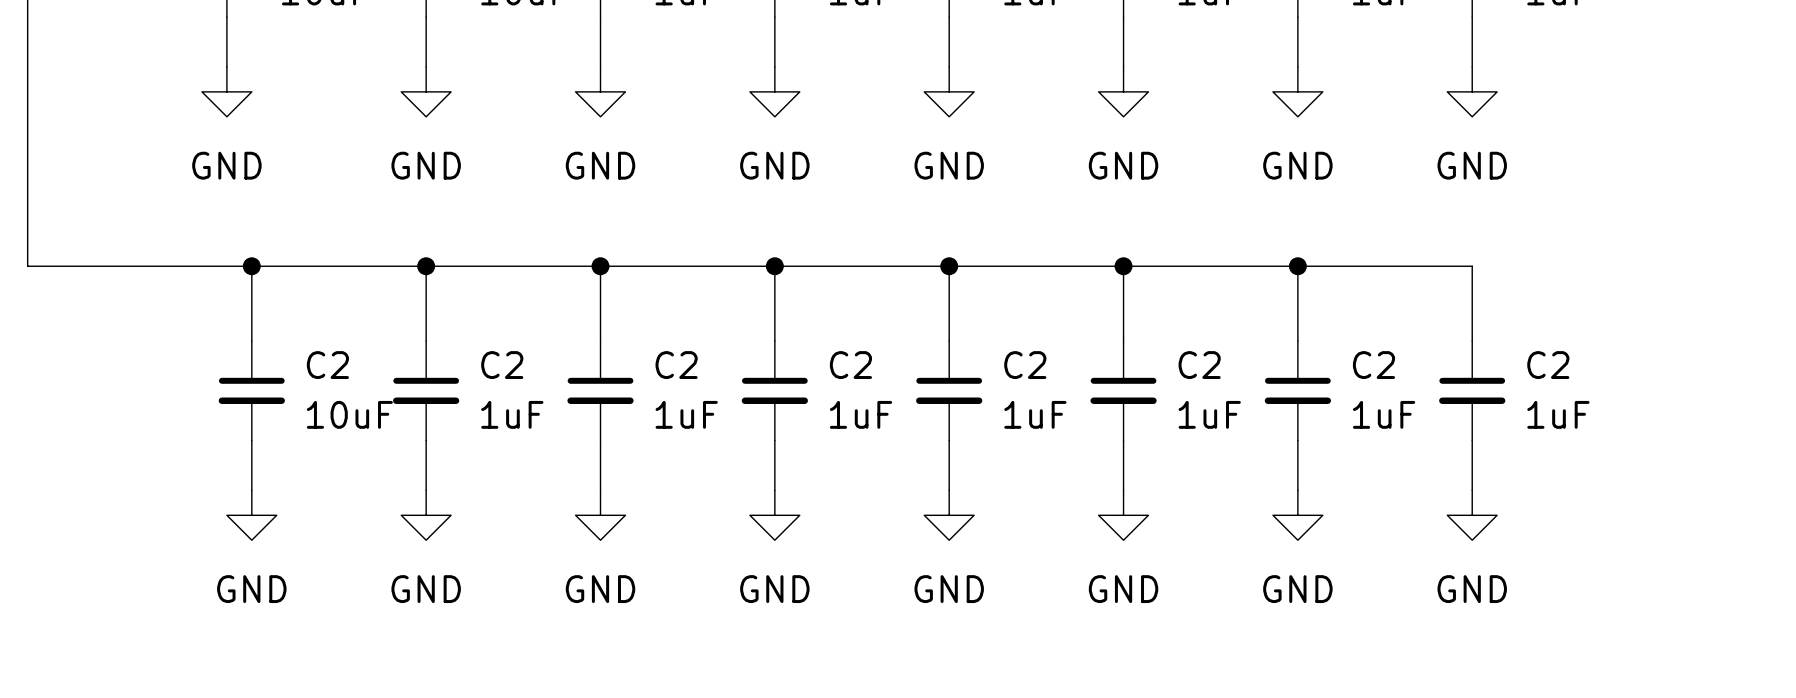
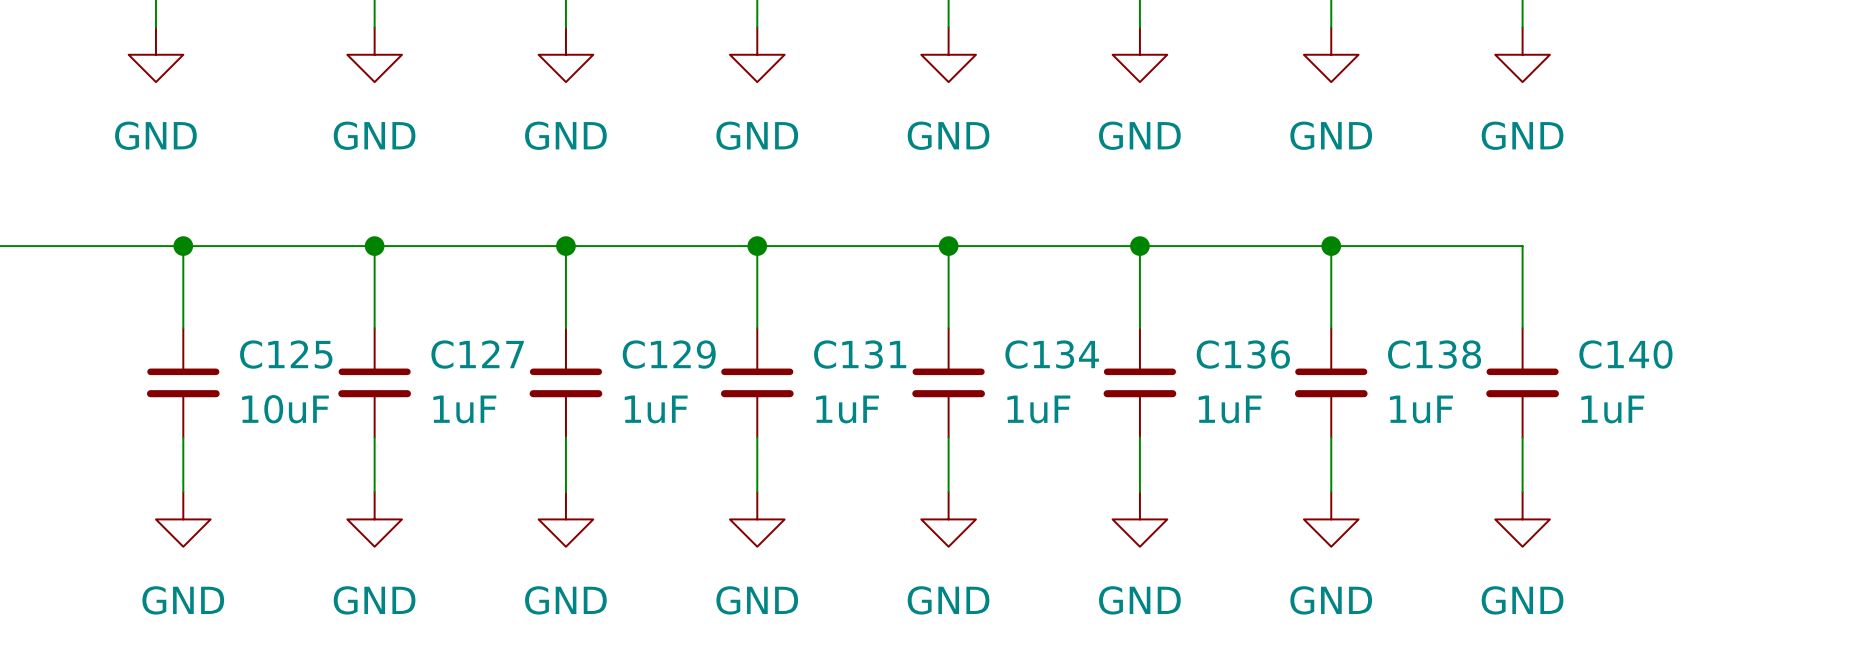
C2 name: C2 (327, 365) -> C125 (286, 354)
C2 name: C2 (502, 365) -> C127 (477, 354)
C2 name: C2 (676, 365) -> C129 (669, 354)
C2 name: C2 (850, 365) -> C131 (860, 354)
C2 name: C2 (1025, 365) -> C134 (1052, 354)
C2 name: C2 (1199, 365) -> C136 (1243, 354)
C2 name: C2 (1373, 365) -> C138 (1434, 354)
C2 name: C2 (1548, 365) -> C140 (1625, 354)

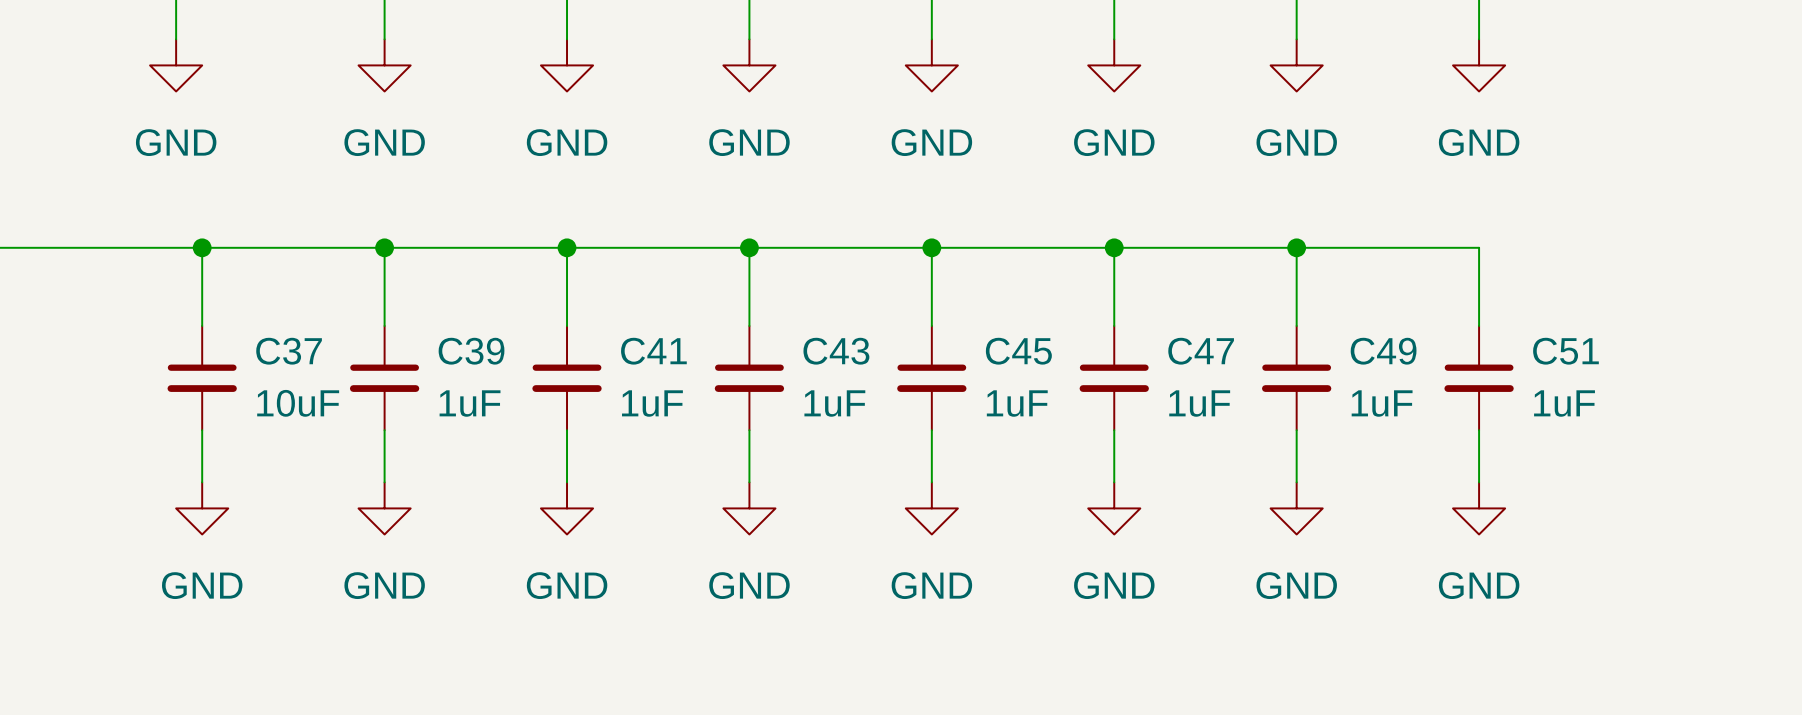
C125 name: C125 (286, 354) -> C37 (289, 351)
C127 name: C127 (477, 354) -> C39 (471, 351)
C129 name: C129 (669, 354) -> C41 (653, 351)
C131 name: C131 (860, 354) -> C43 (836, 351)
C134 name: C134 (1052, 354) -> C45 (1018, 351)
C136 name: C136 (1243, 354) -> C47 (1201, 351)
C138 name: C138 (1434, 354) -> C49 (1383, 351)
C140 name: C140 (1625, 354) -> C51 (1565, 351)

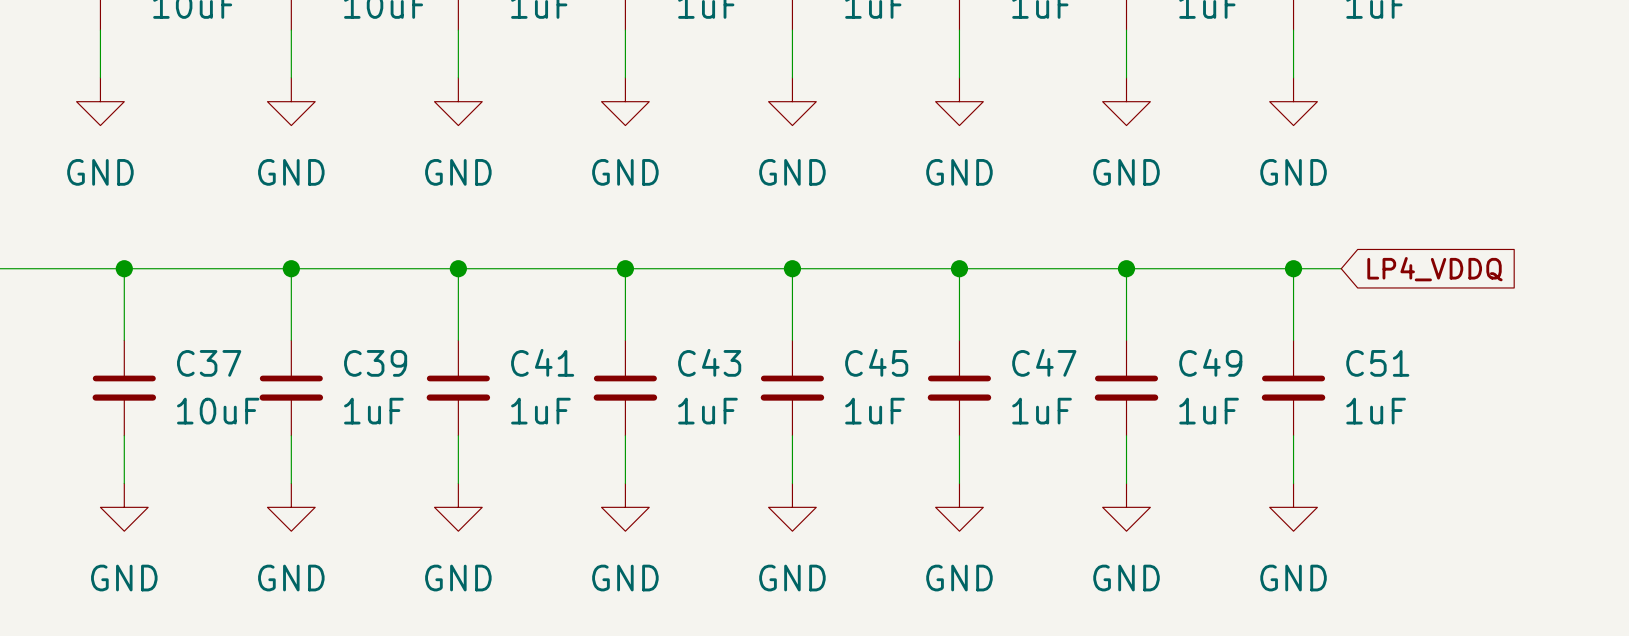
wire: none -> (1293, 268) (1341, 268)
junction: none -> (1293, 268)
global label: none -> LP4_VDDQ (1434, 269)

